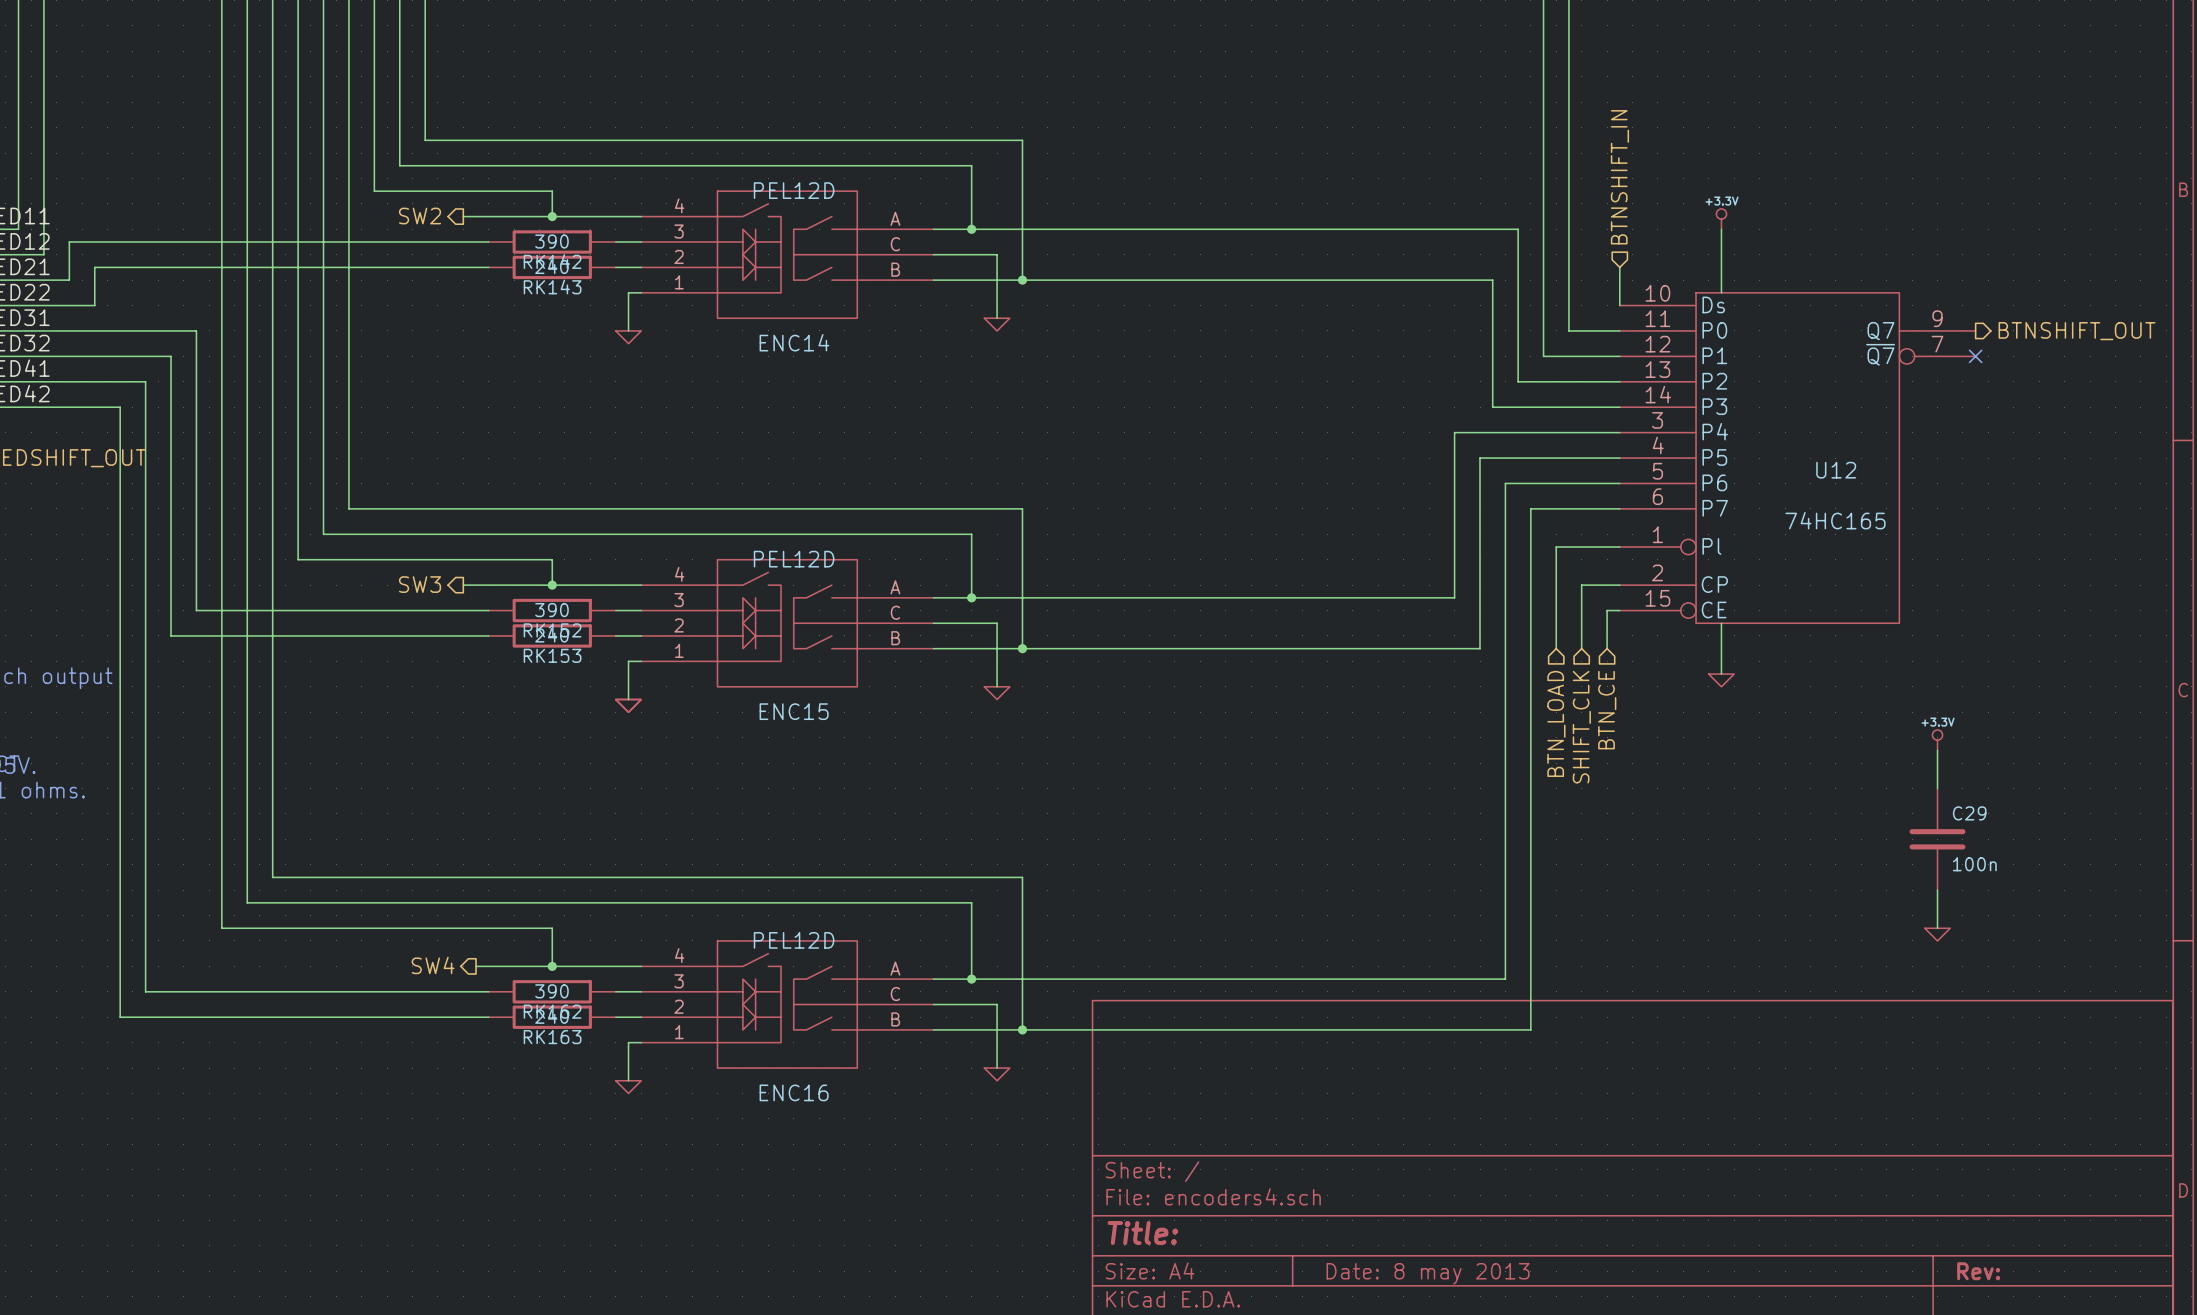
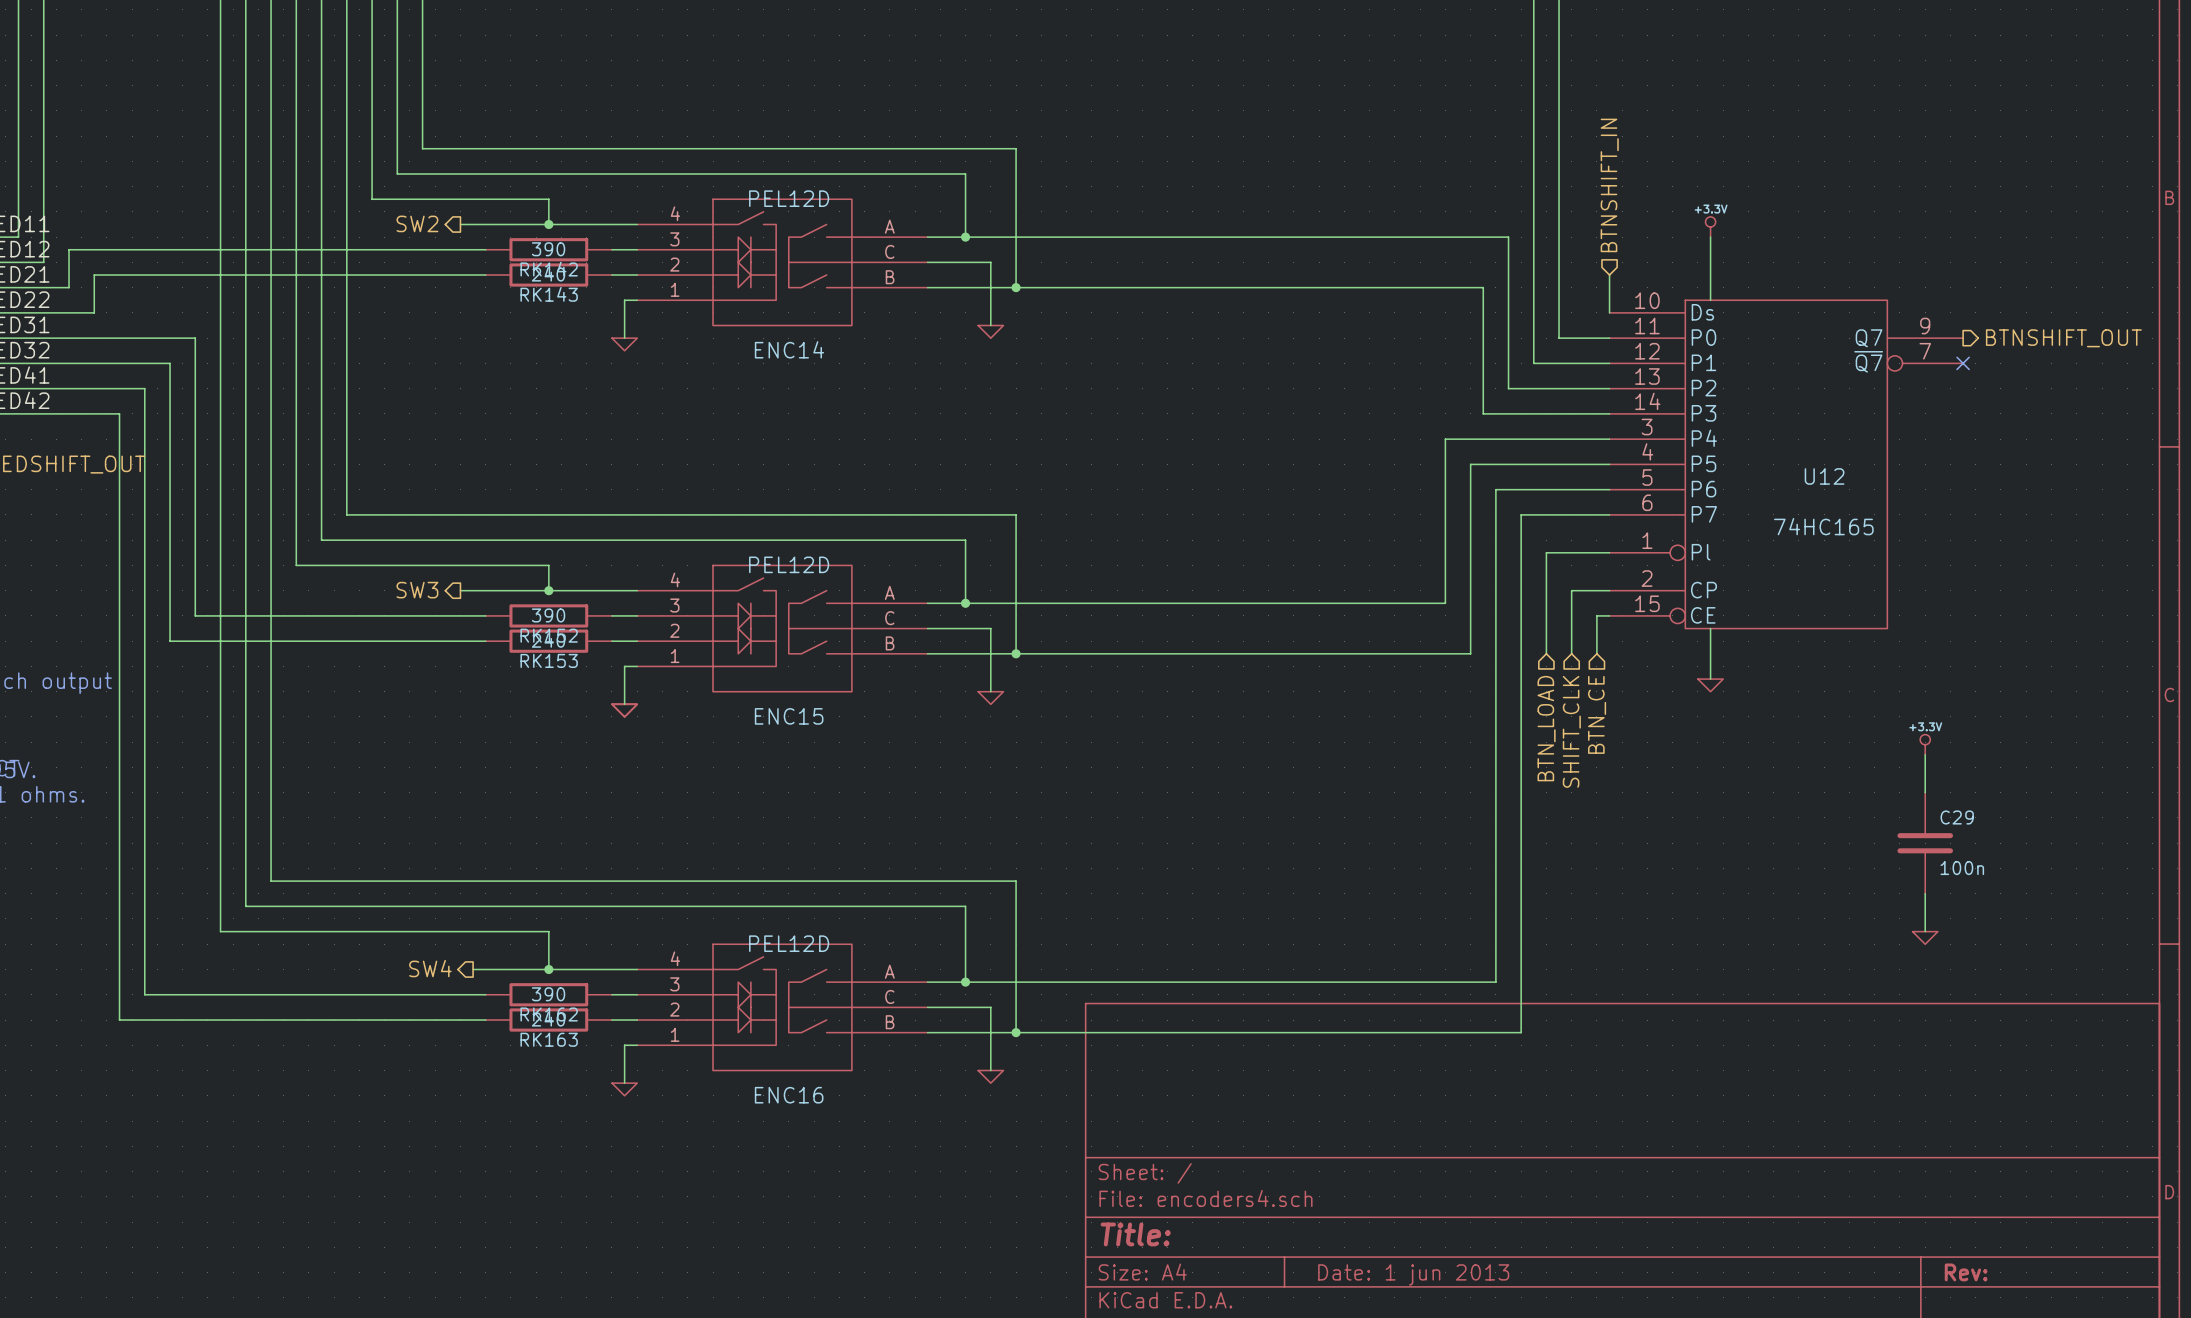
title block: Date: 8 may 2013 (1428, 1273) -> Date: 1 jun 2013 (1413, 1274)

